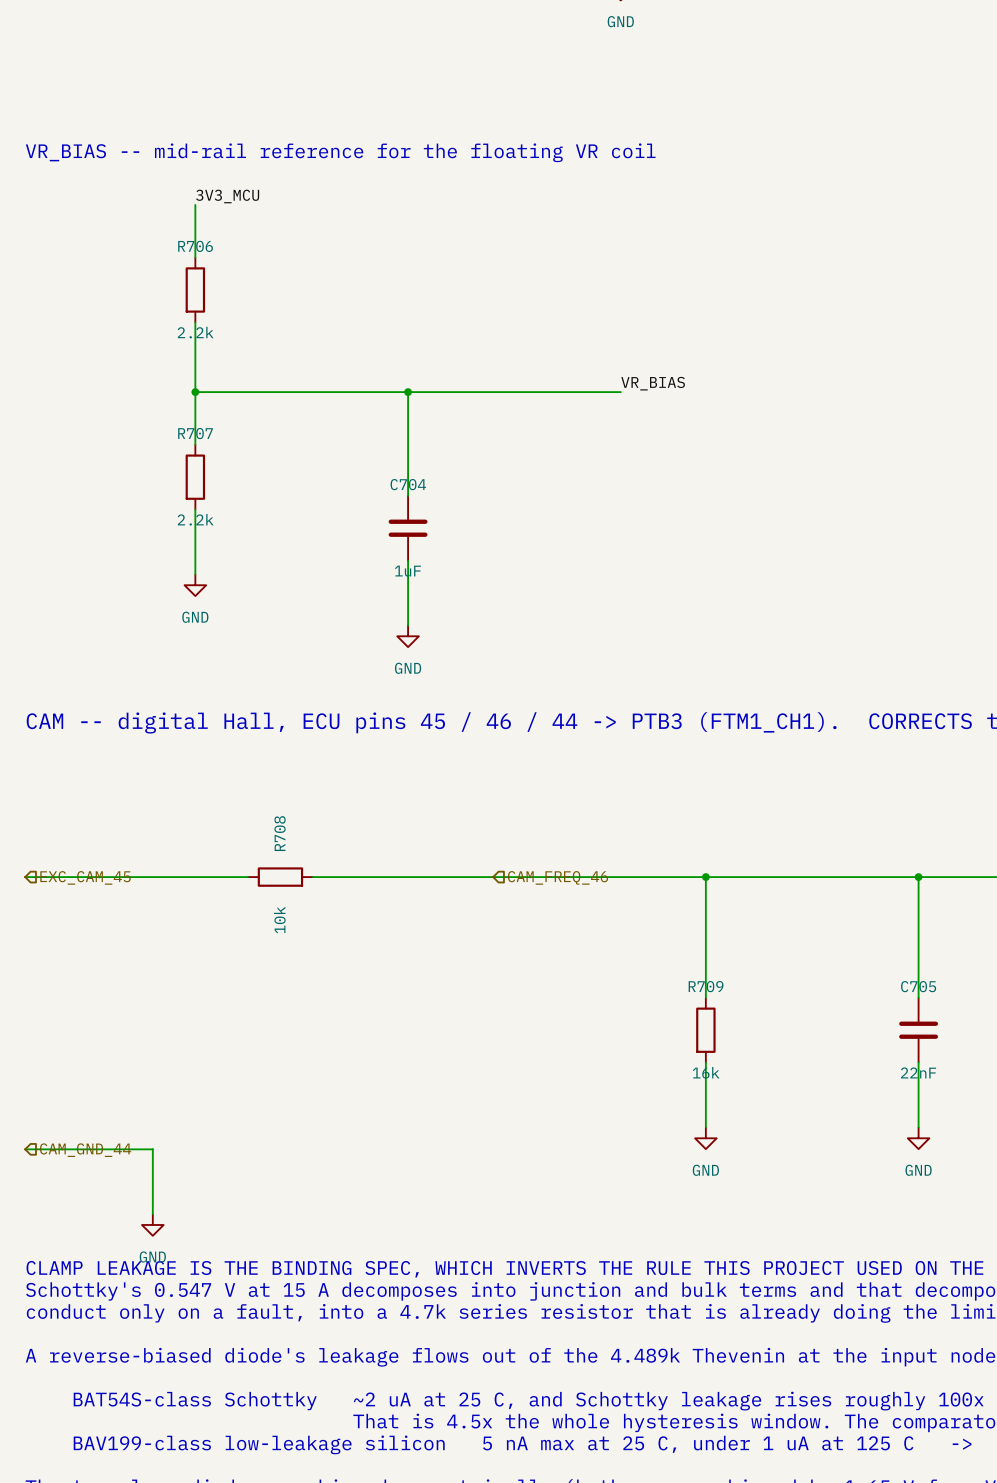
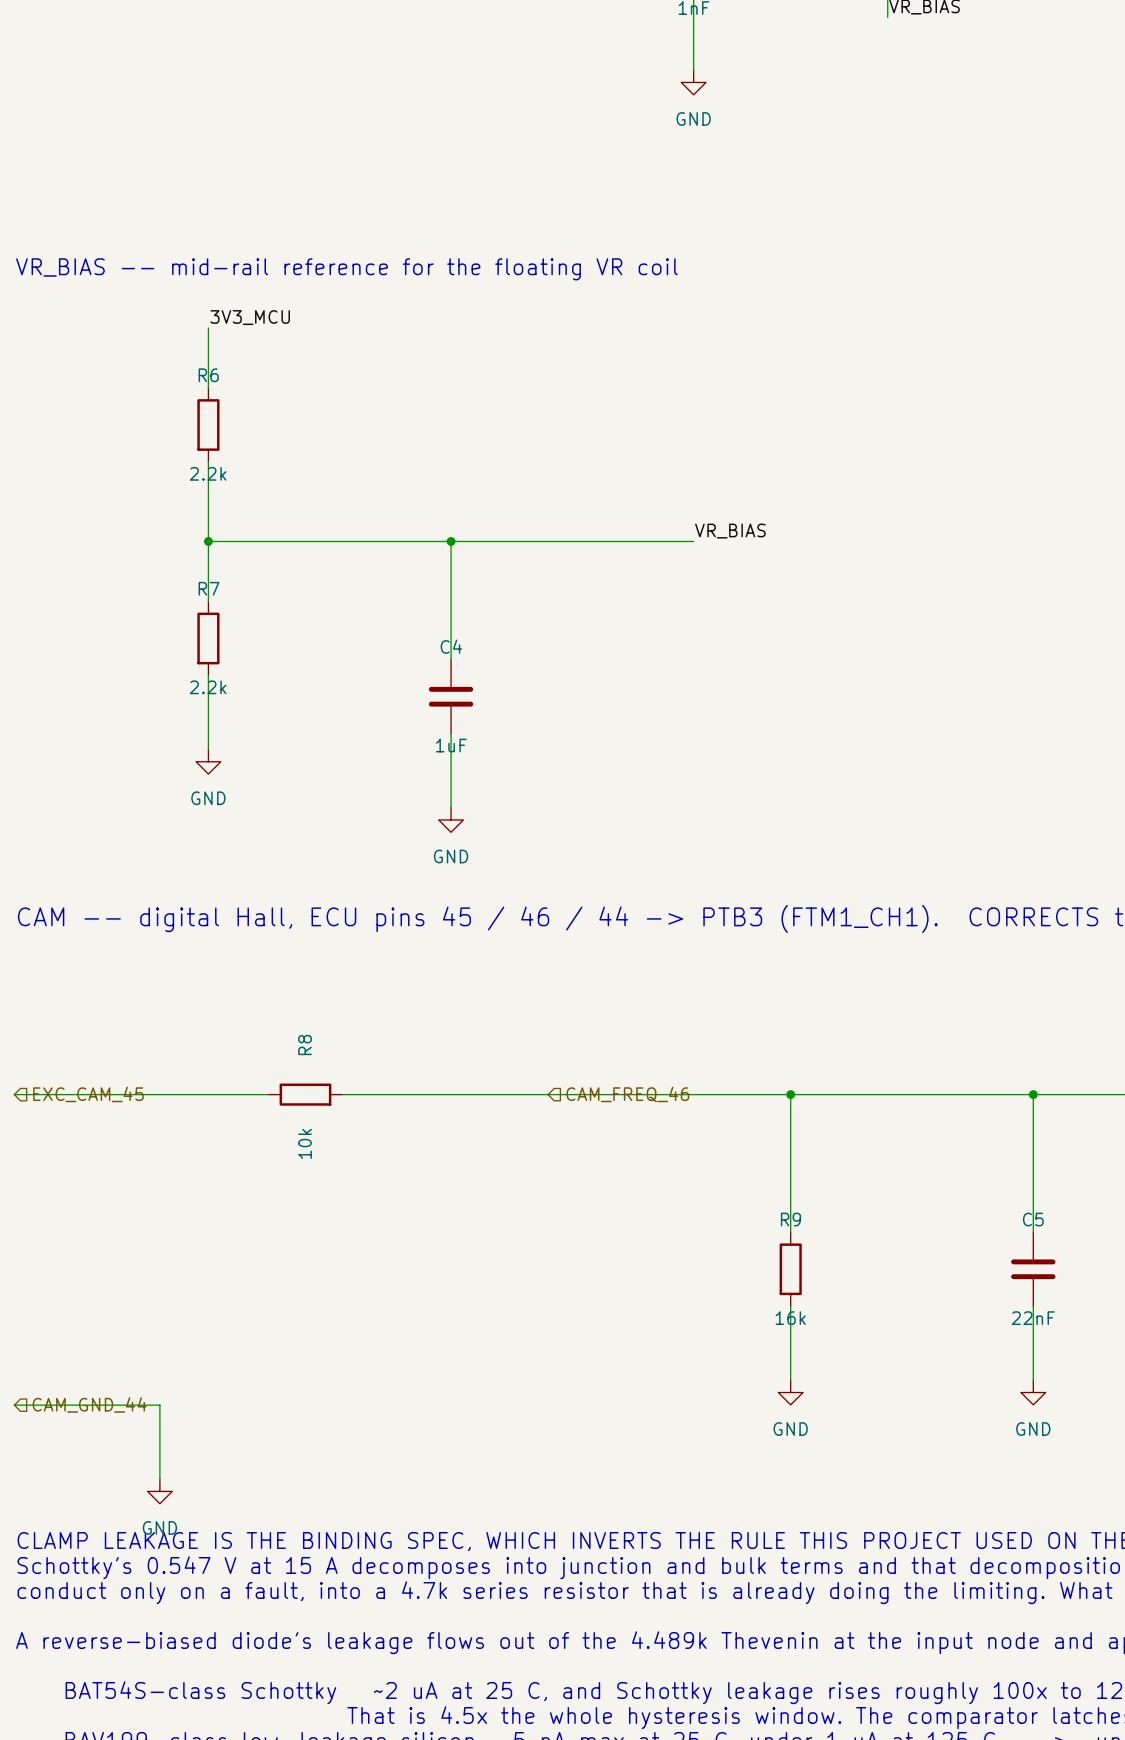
R706 name: R706 (195, 246) -> R6 (208, 375)
R707 name: R707 (195, 433) -> R7 (209, 588)
C704 name: C704 (408, 484) -> C4 (451, 646)
R708 name: R708 (280, 833) -> R8 (305, 1045)
R709 name: R709 (706, 986) -> R9 (790, 1219)
C705 name: C705 (918, 986) -> C5 (1033, 1219)

